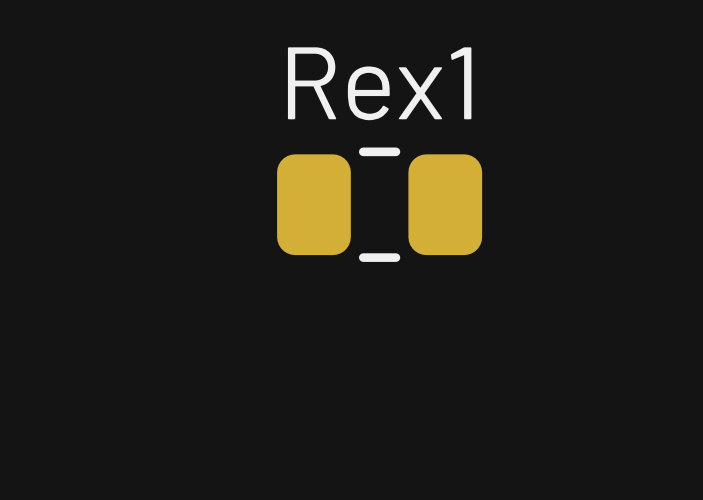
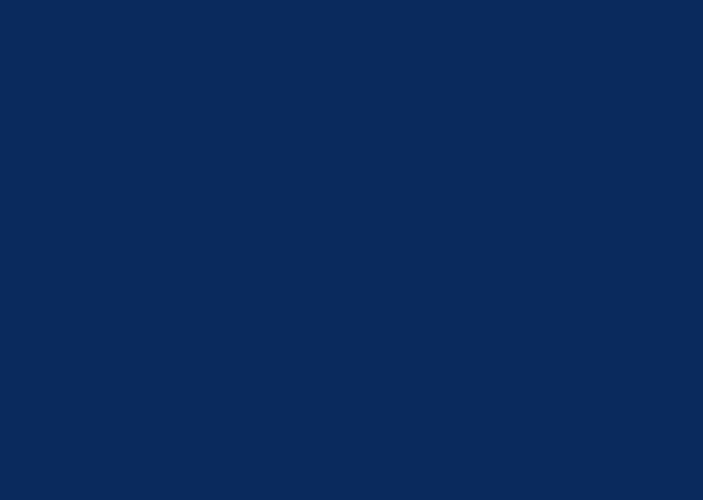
Rex1: (379, 204) -> none

